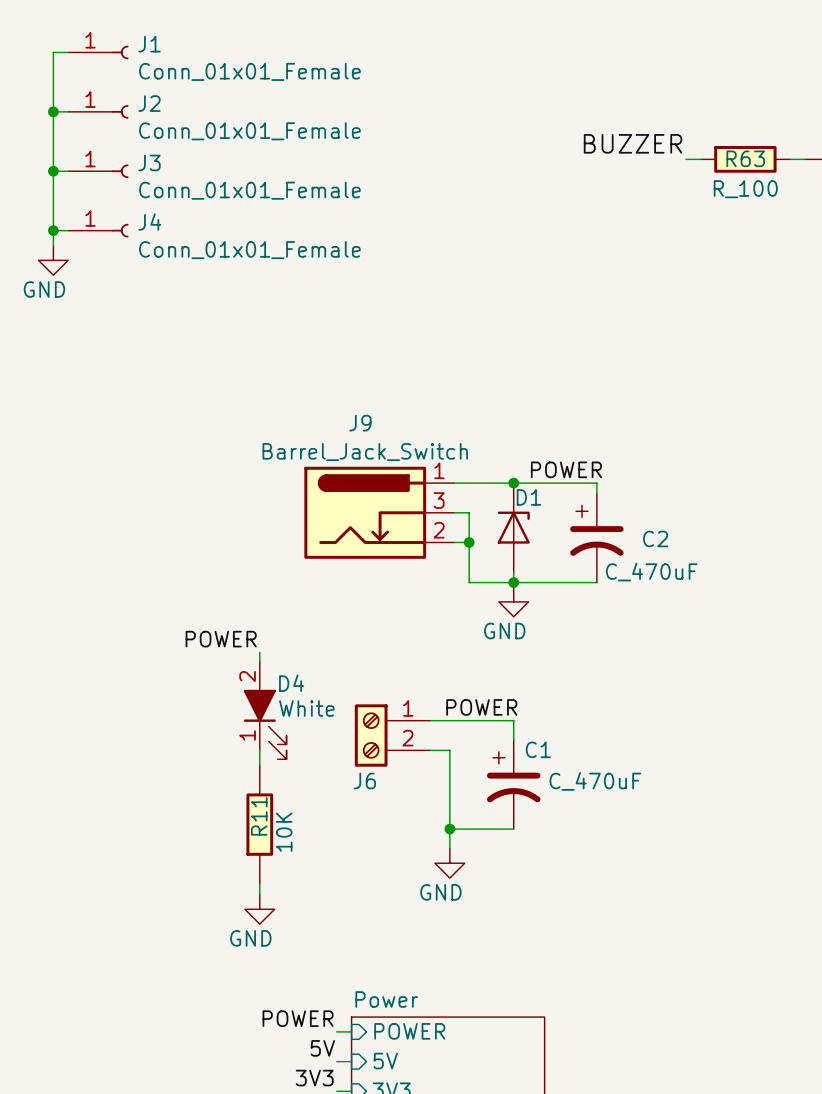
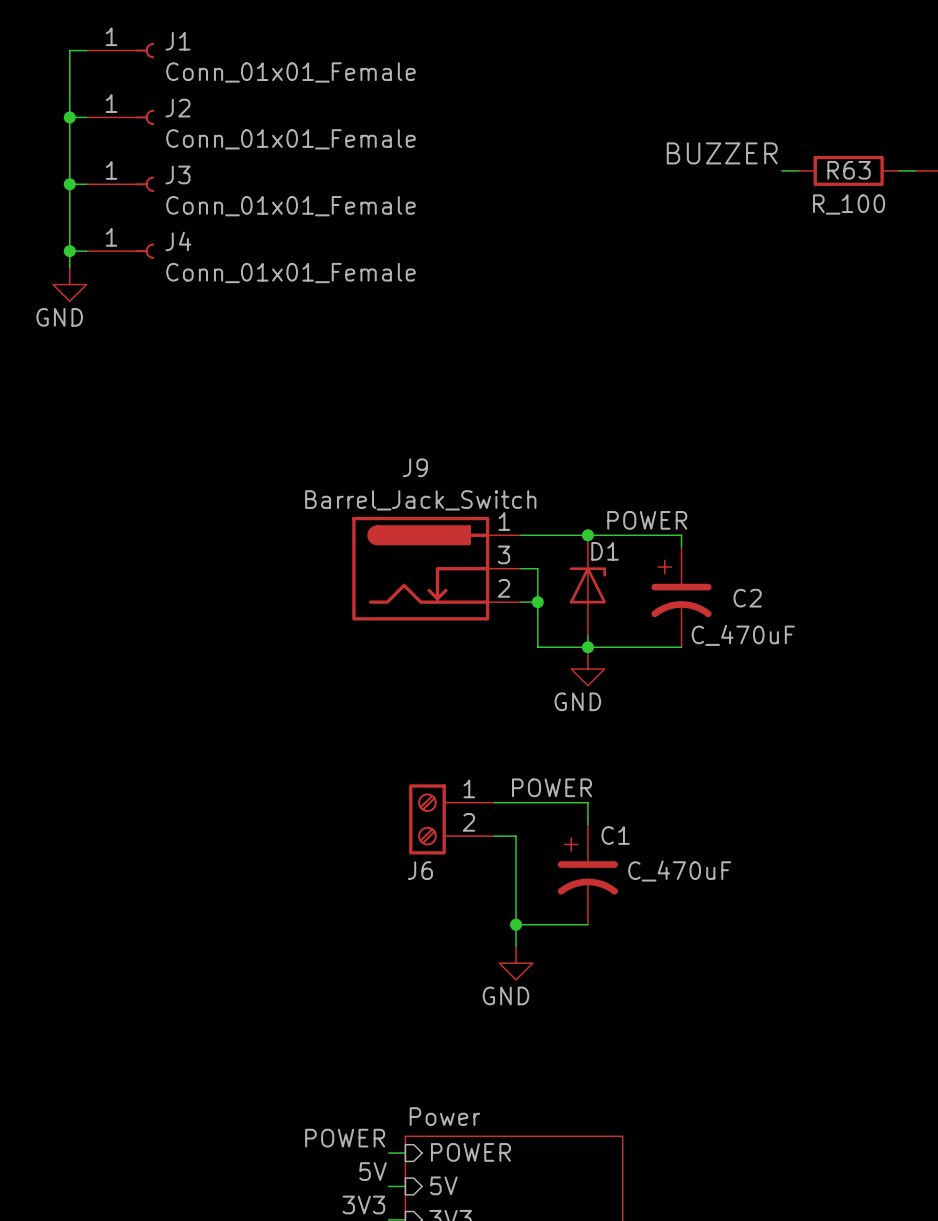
label: POWER (221, 639) -> none
wire: (259, 652) (259, 661) -> none
D4: White (265, 710) -> none
wire: (259, 750) (259, 765) -> none
R11: 10K (259, 824) -> none
wire: (259, 884) (259, 894) -> none
power symbol: GND (259, 909) -> none

